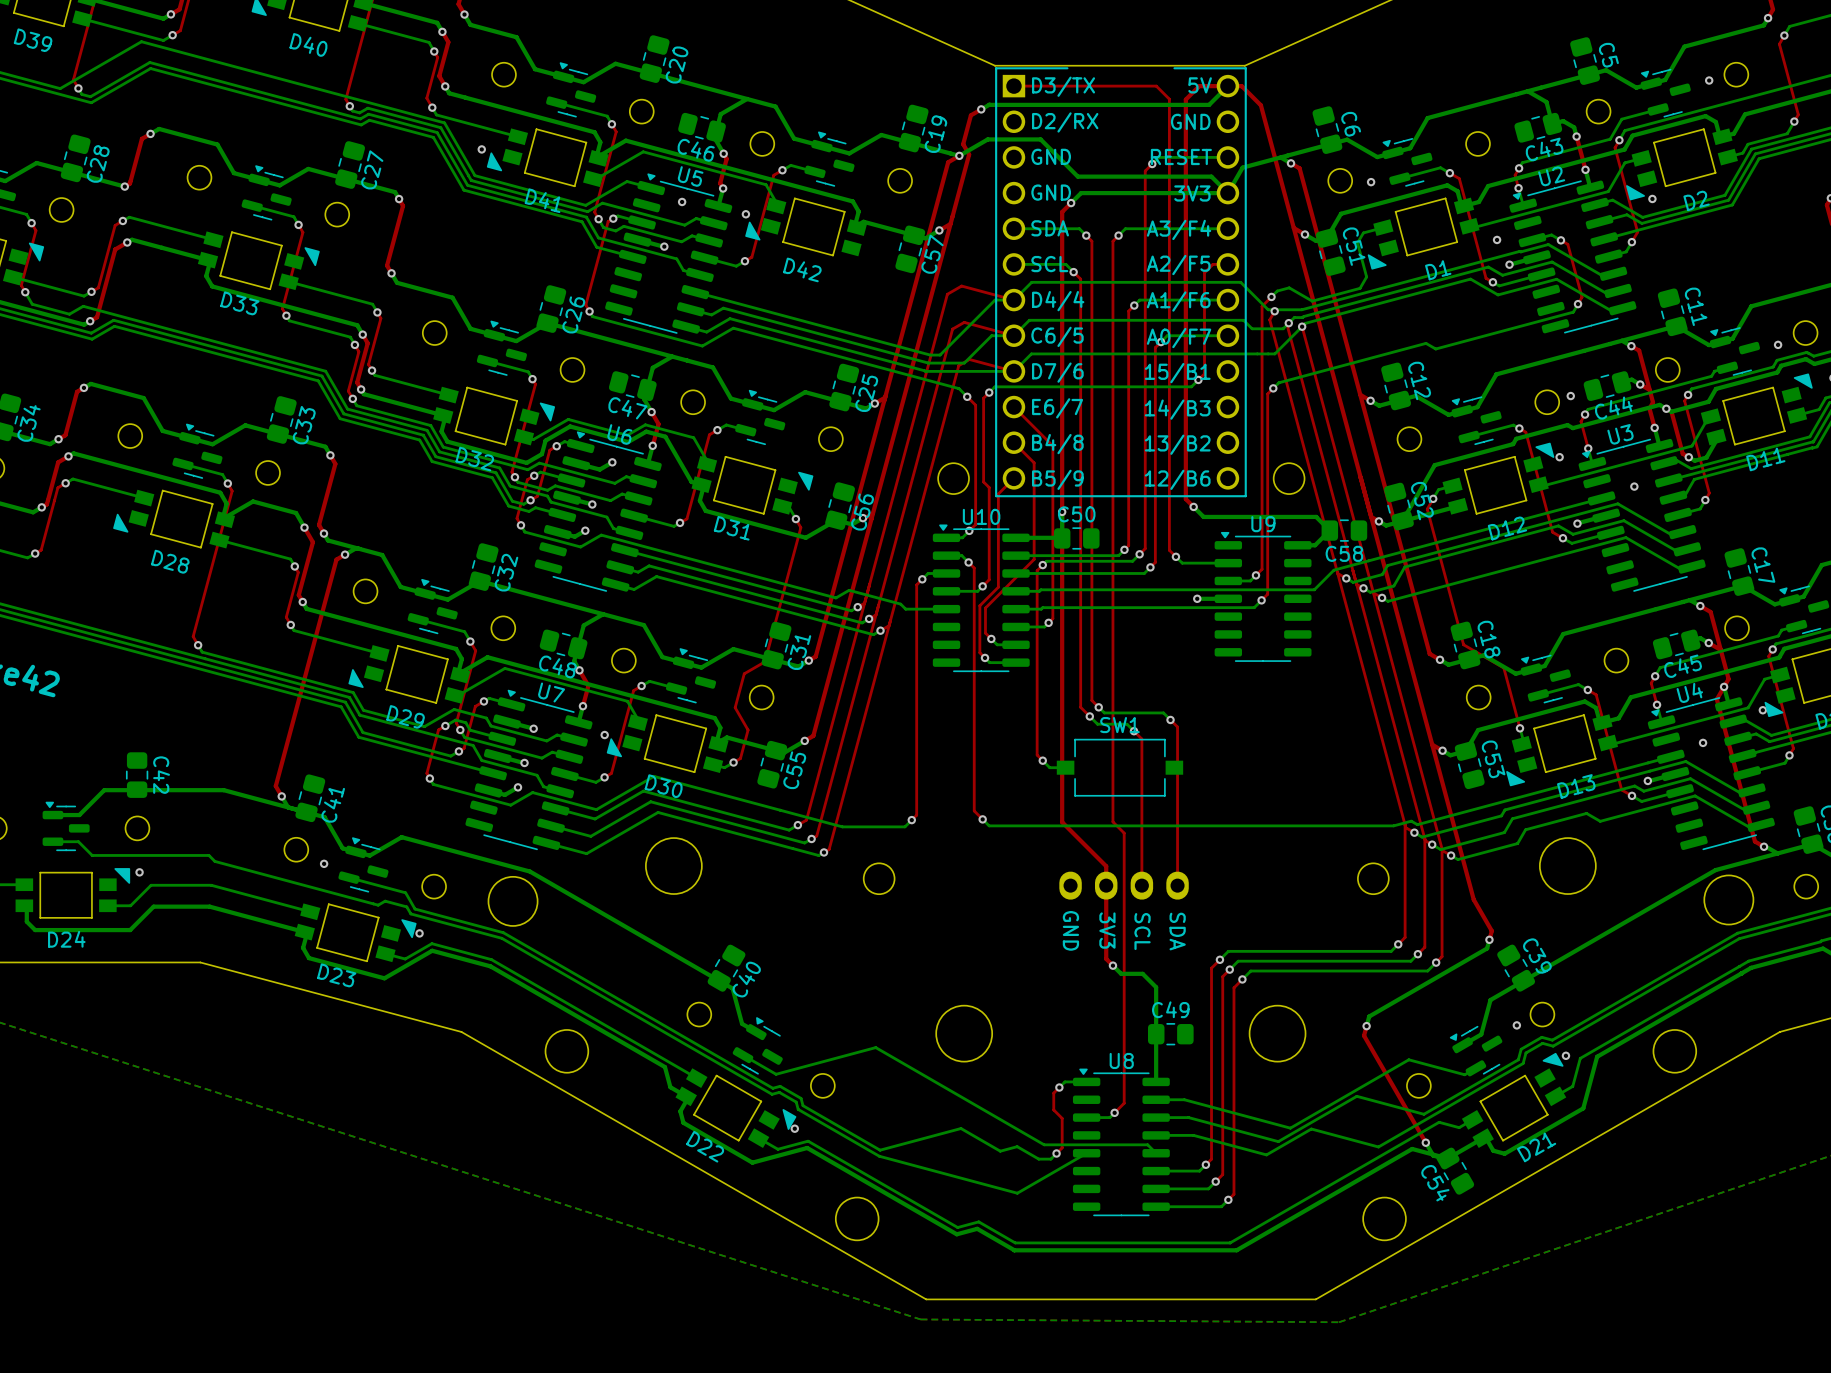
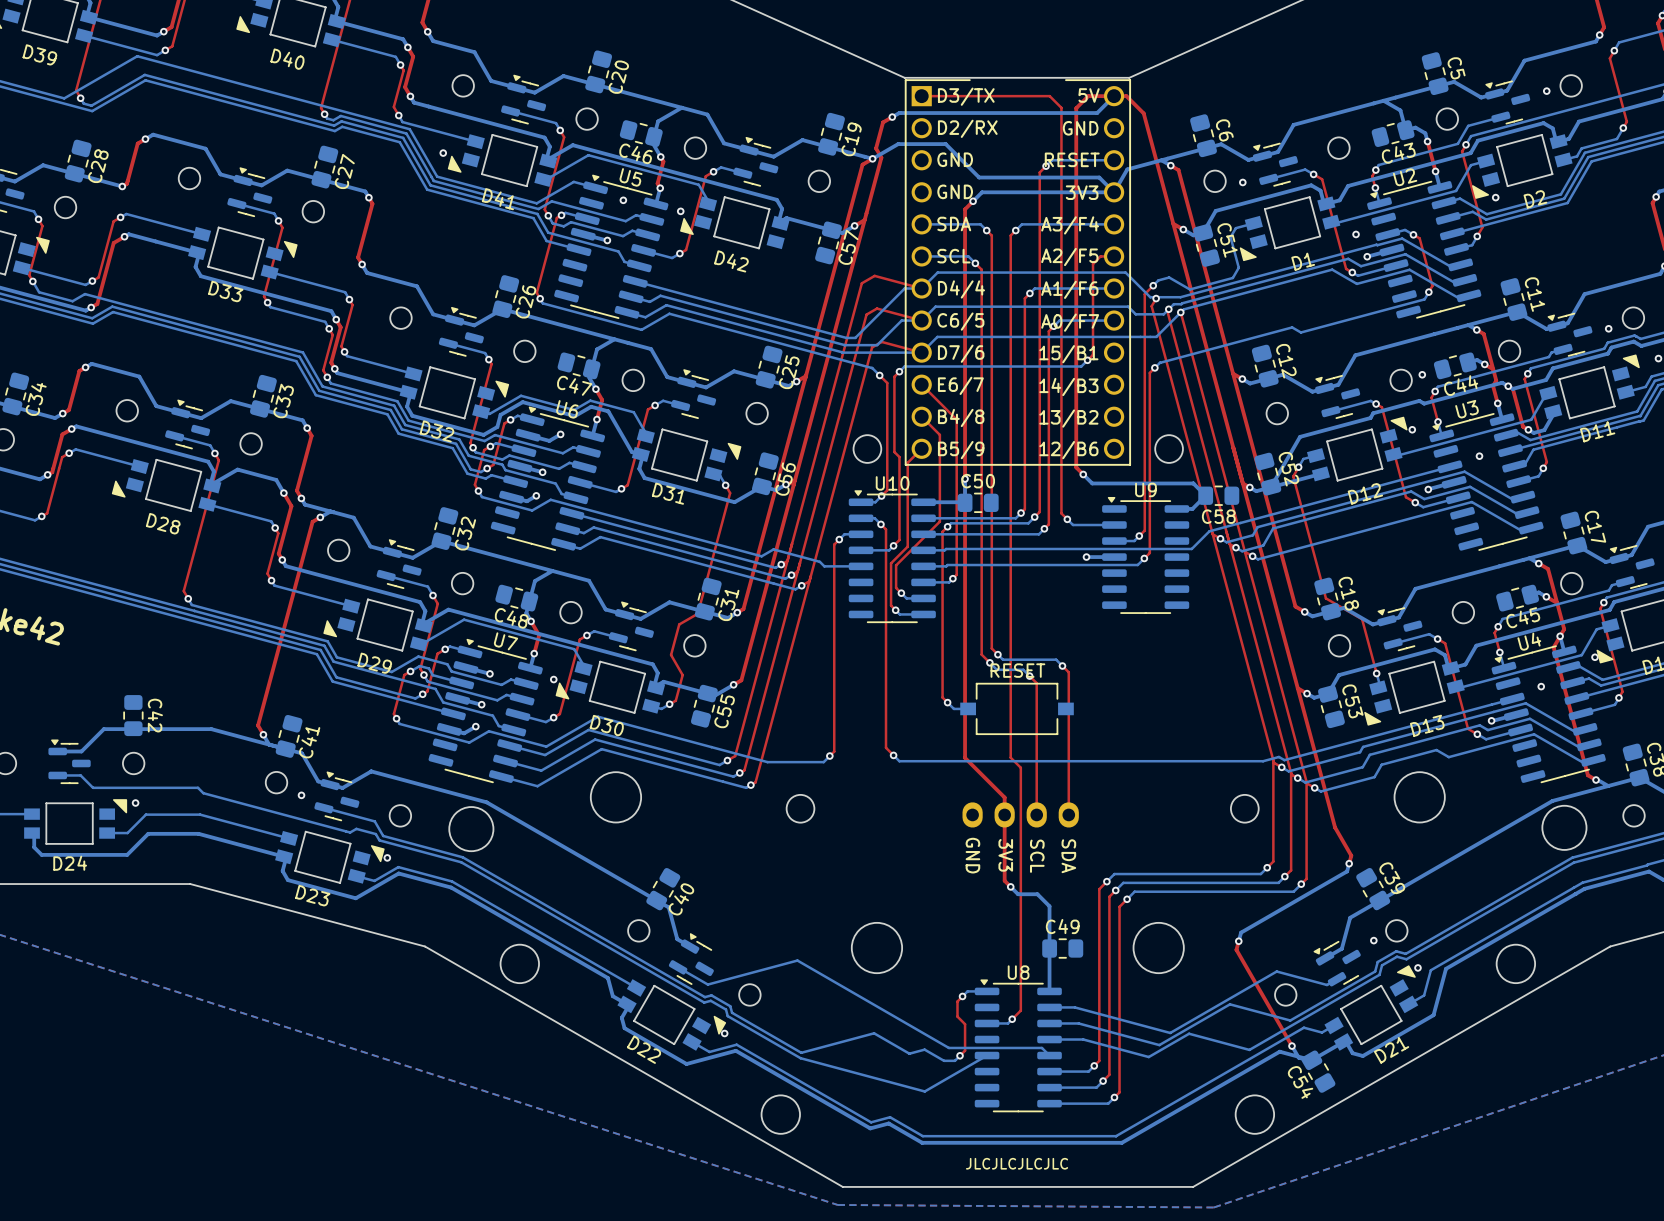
SW1 name: SW1 (1119, 725) -> RESET (1017, 670)
text: none -> JLCJLCJLCJLC (1017, 1163)

